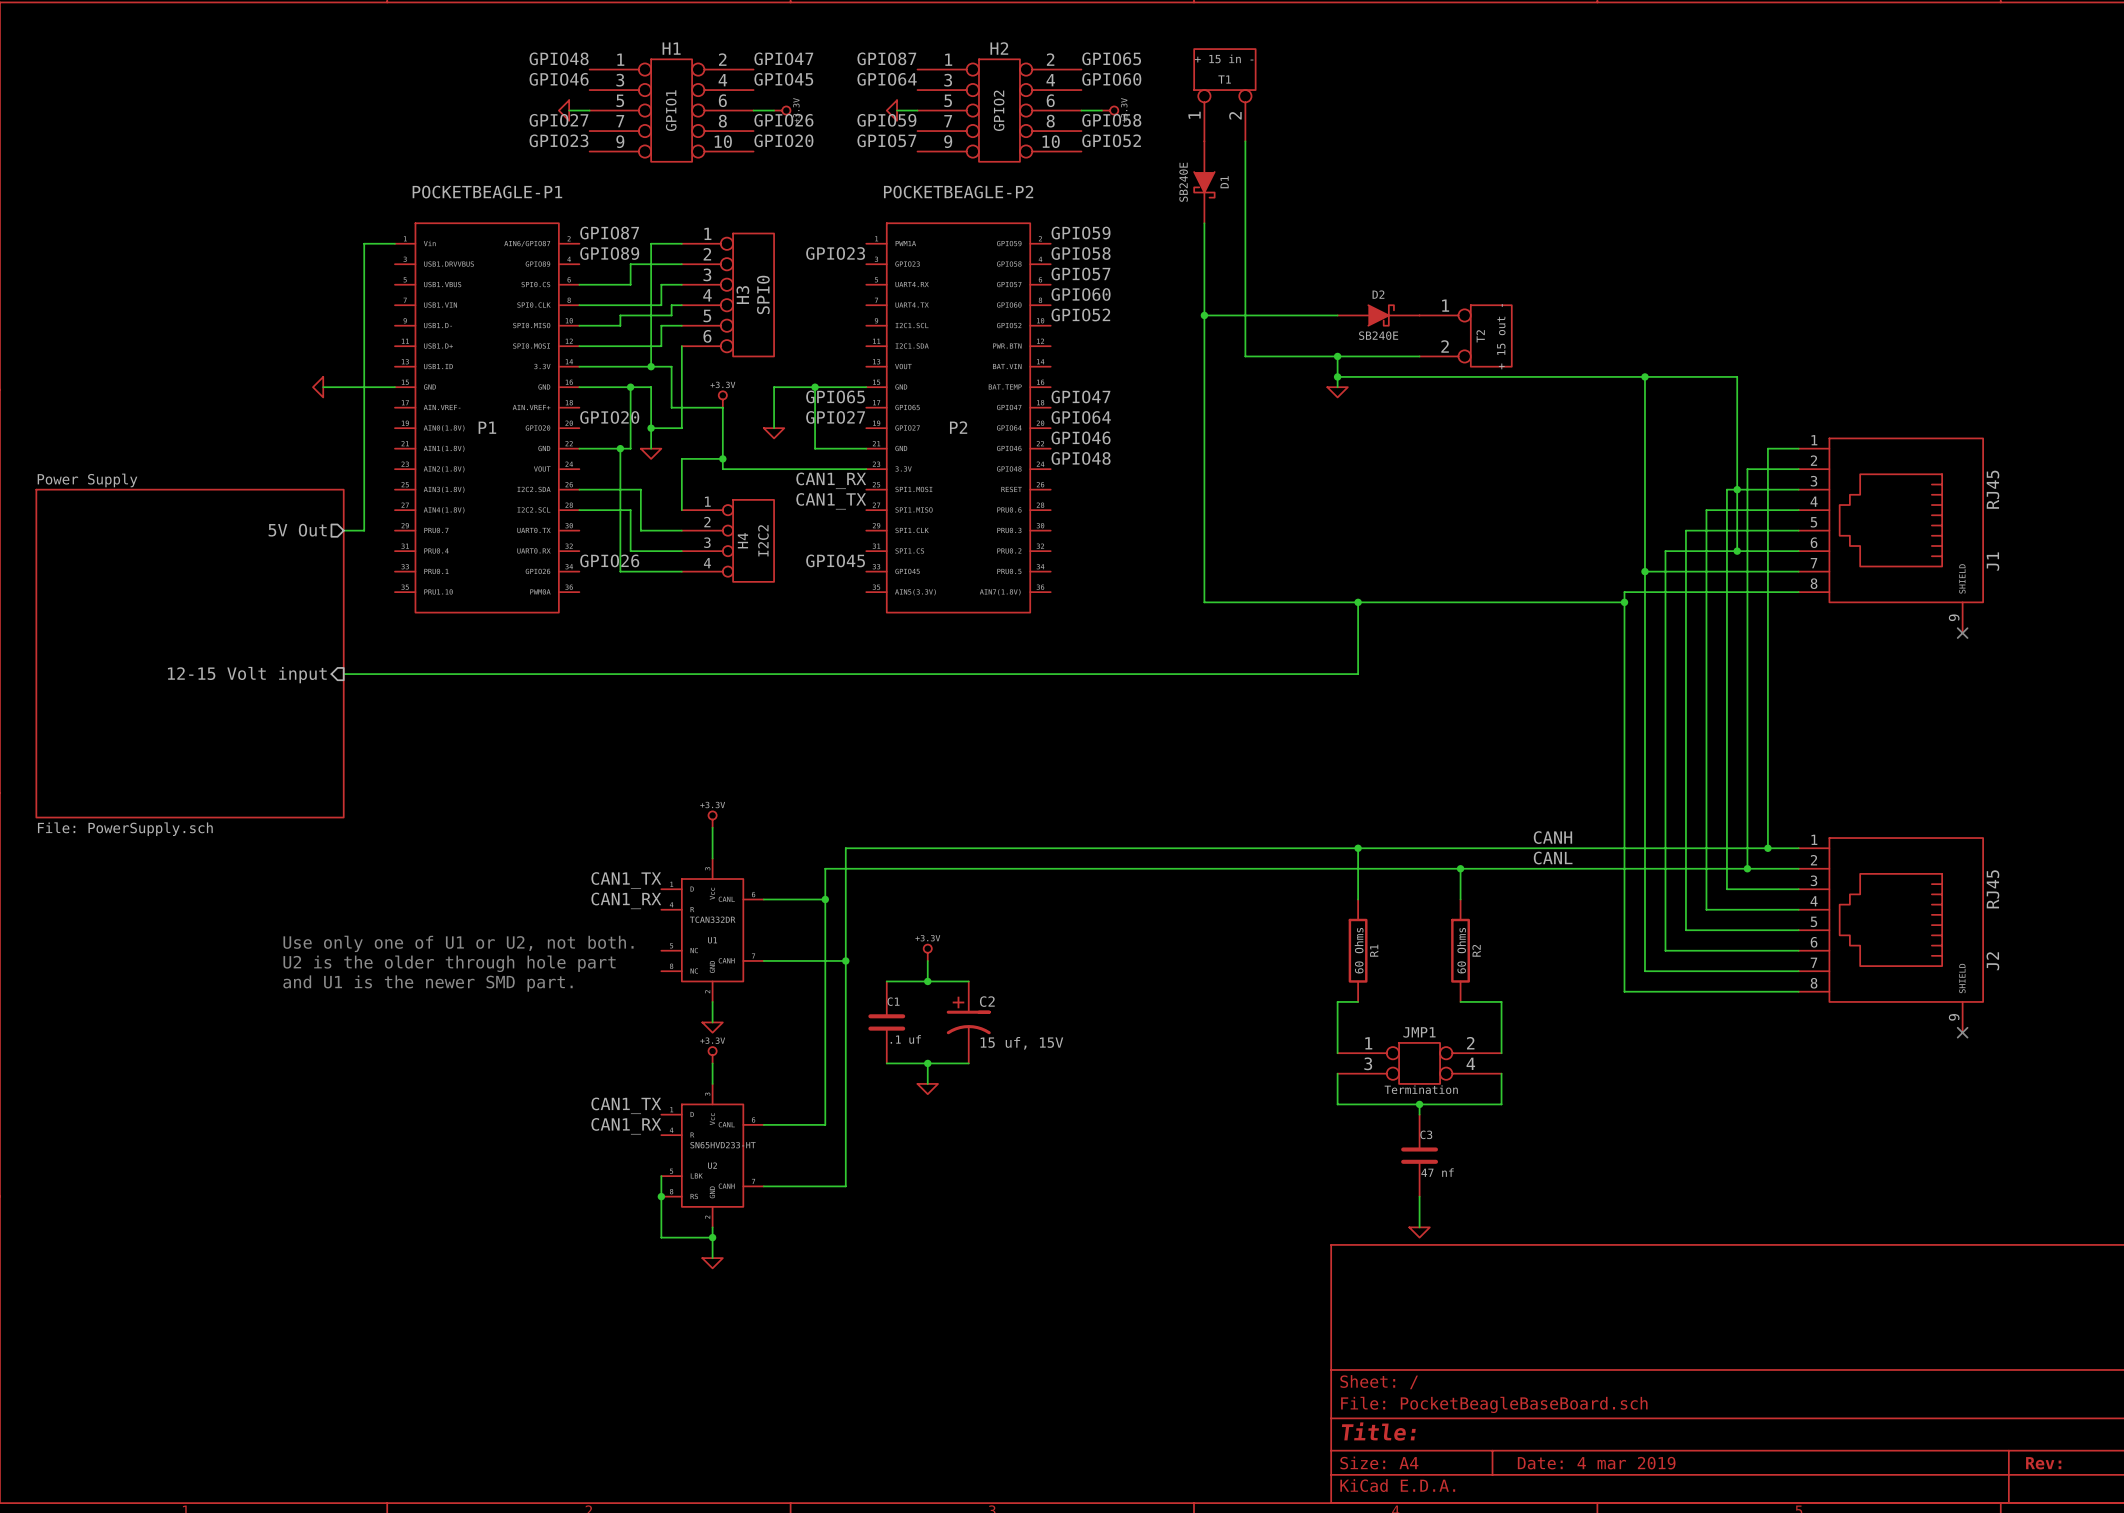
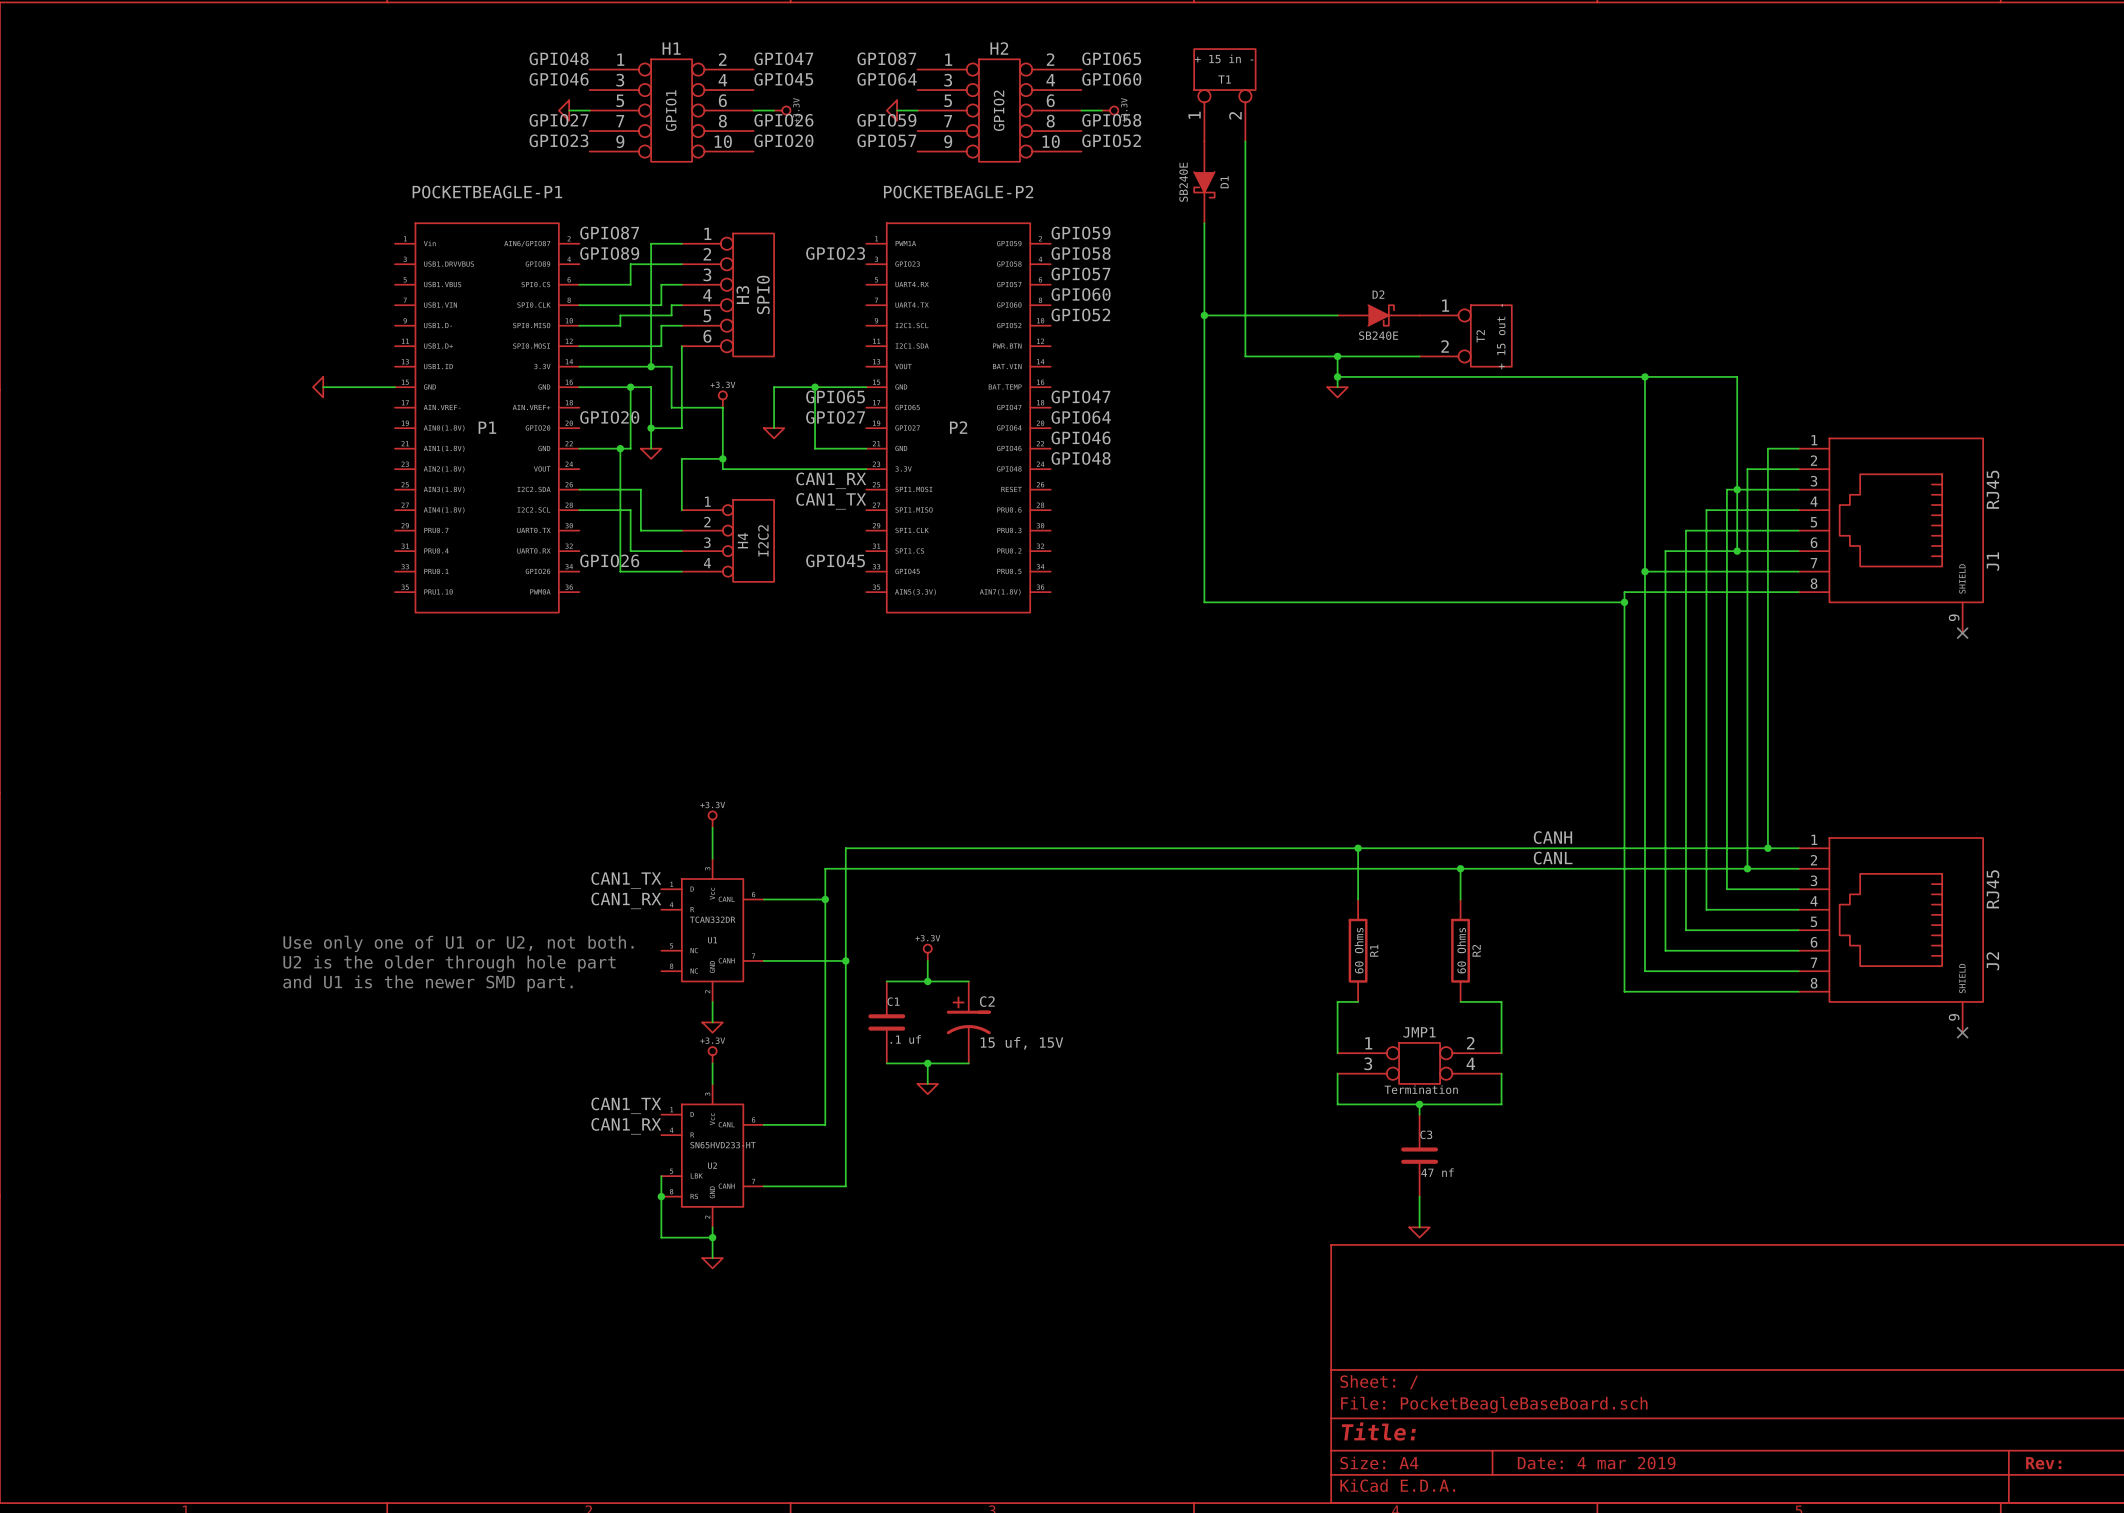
wire: (394, 243) (364, 243) (364, 530) (343, 530) -> none
sheet pin: 5V Out (297, 530) -> none
wire: (1358, 602) (1358, 674) (343, 674) -> none
junction: (1358, 602) -> none
sheet Power Supply: File: PowerSupply.sch (190, 653) -> none
sheet pin: 12-15 Volt input (247, 675) -> none

